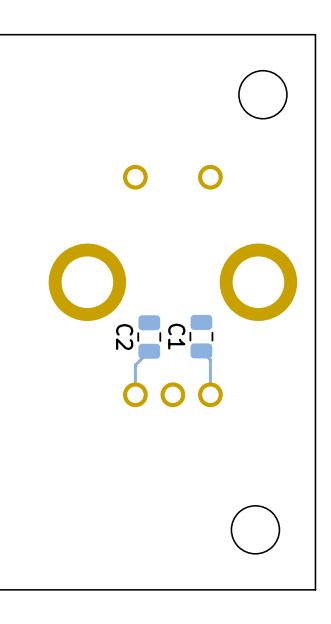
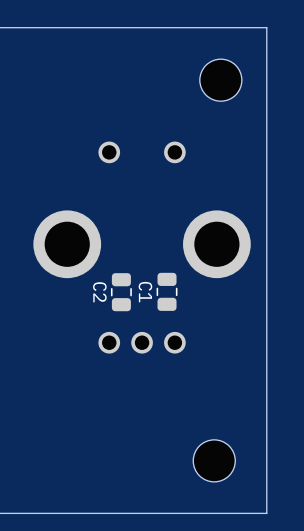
track: (201, 350) (210, 359) (210, 394) -> none
track: (149, 351) (135, 365) (135, 394) -> none

